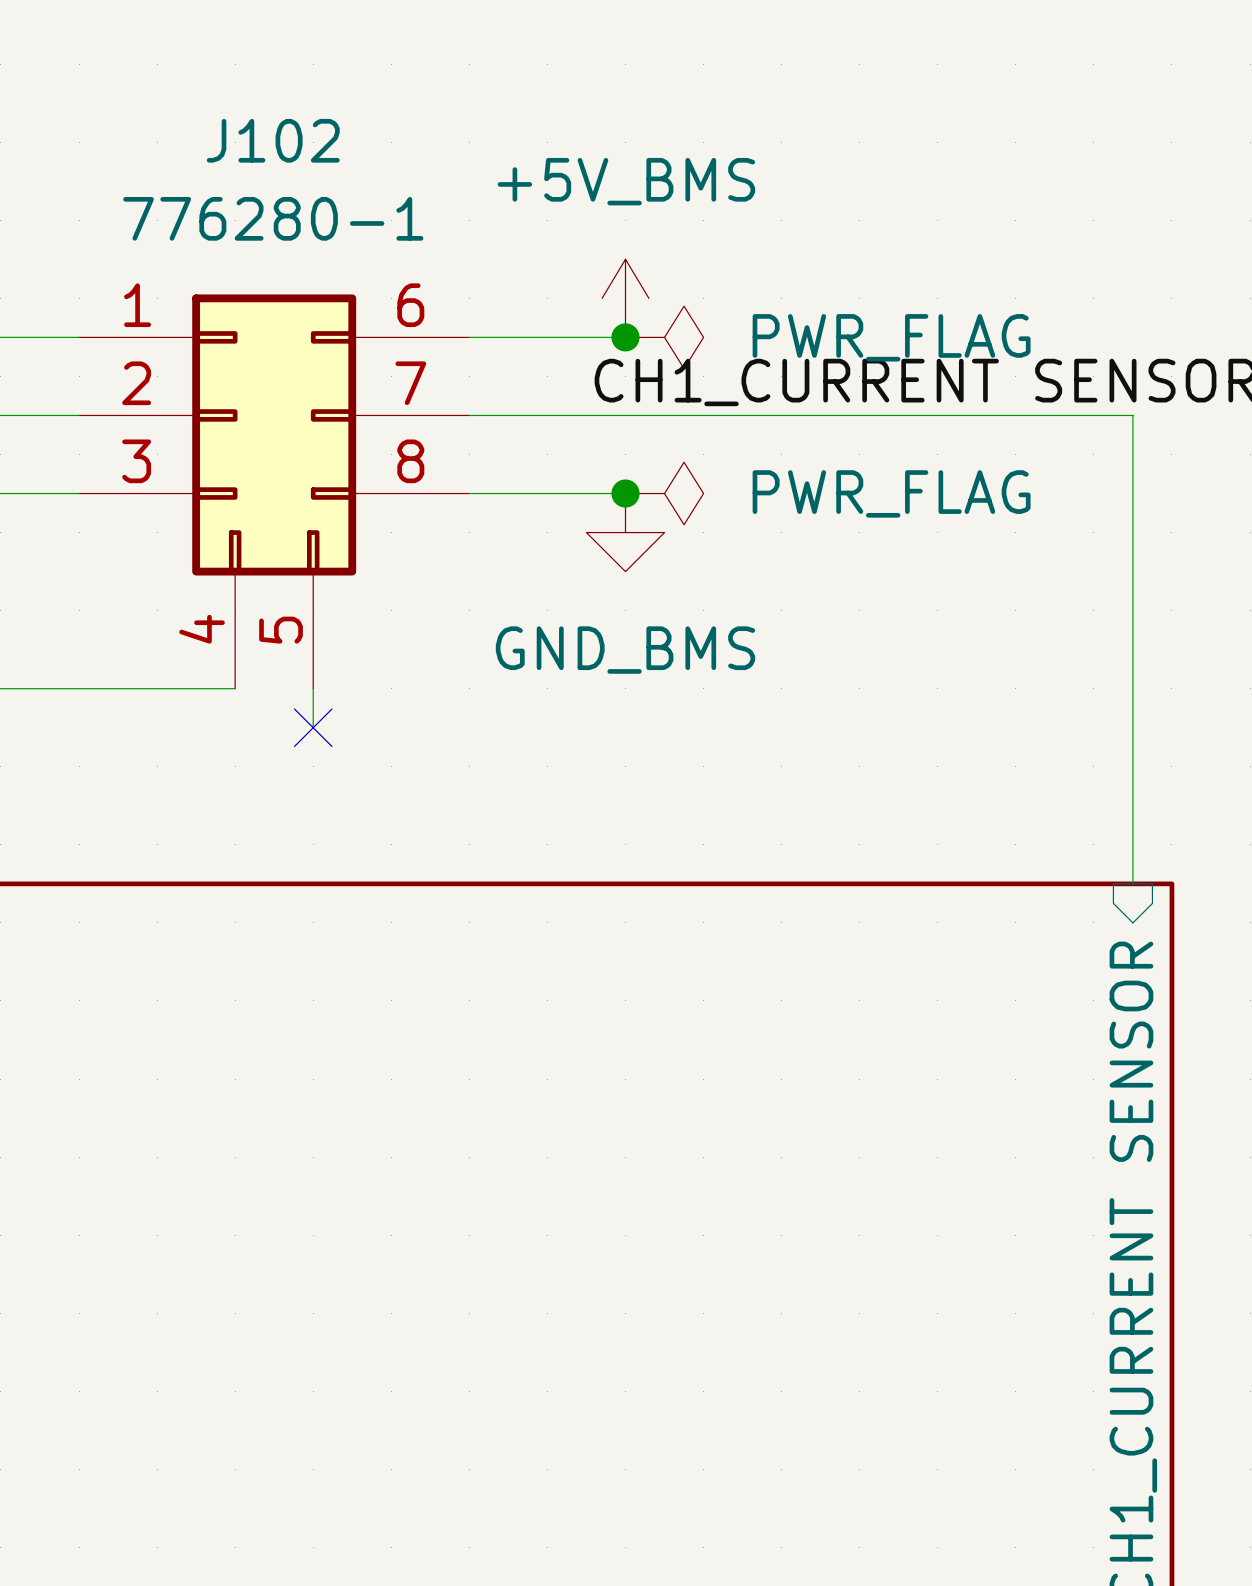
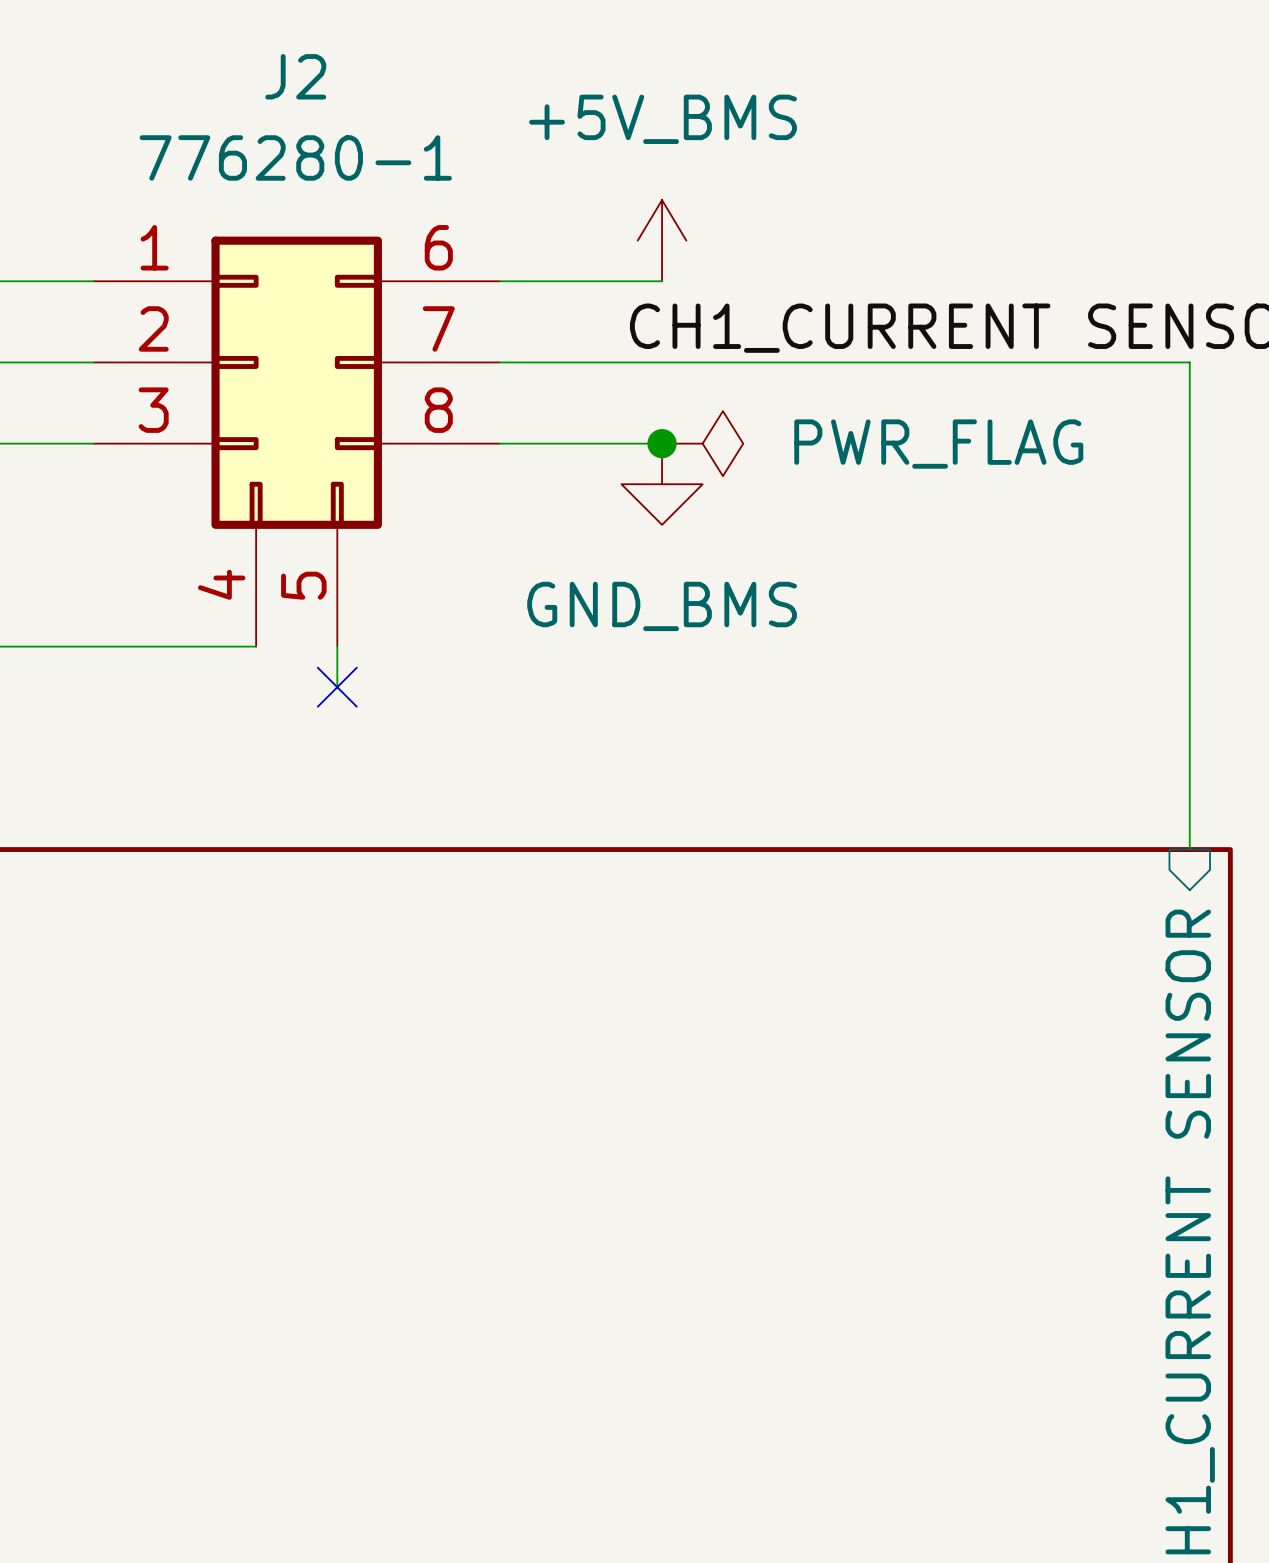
J102 name: J102 (273, 140) -> J2 (295, 76)
junction: (625, 337) -> none
power symbol: PWR_FLAG (664, 337) -> none

